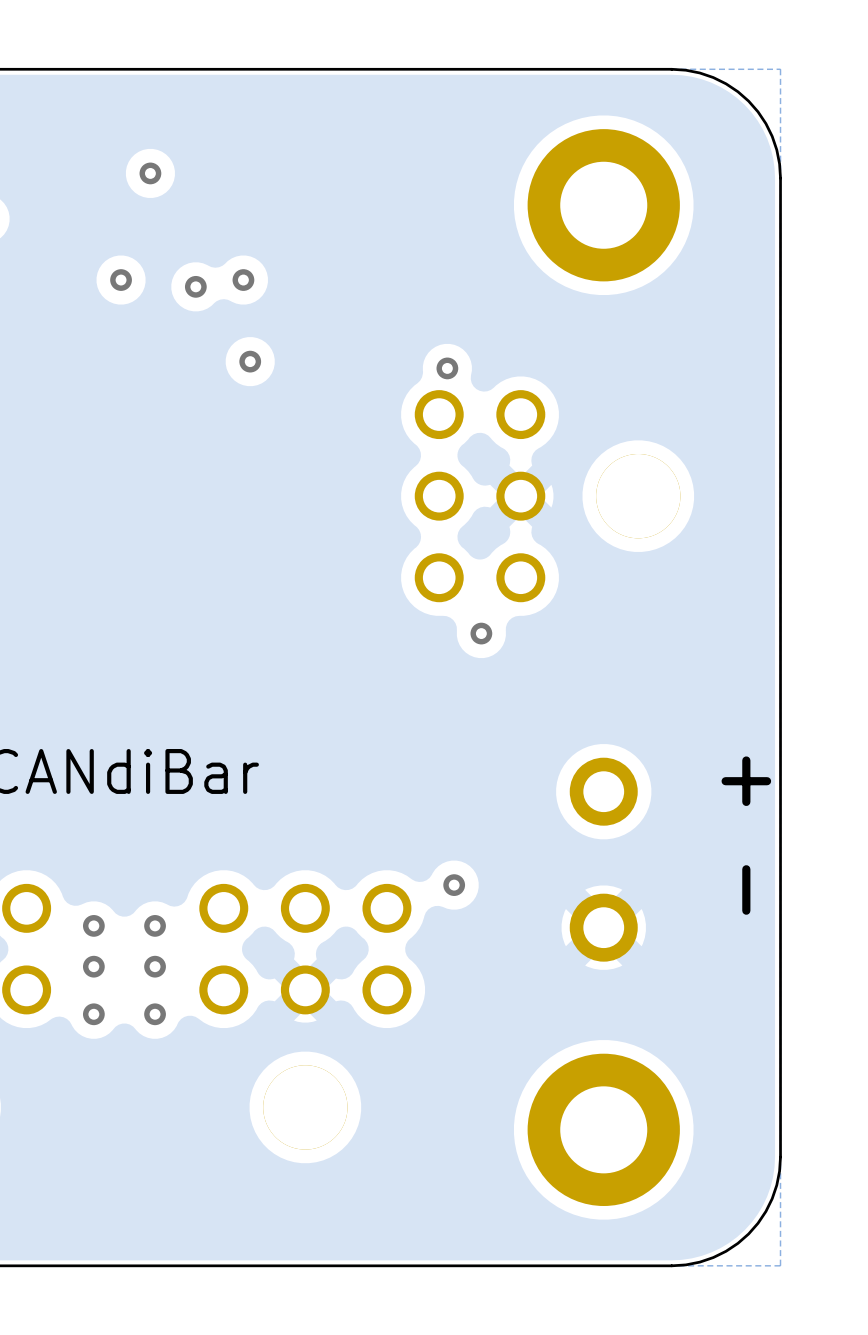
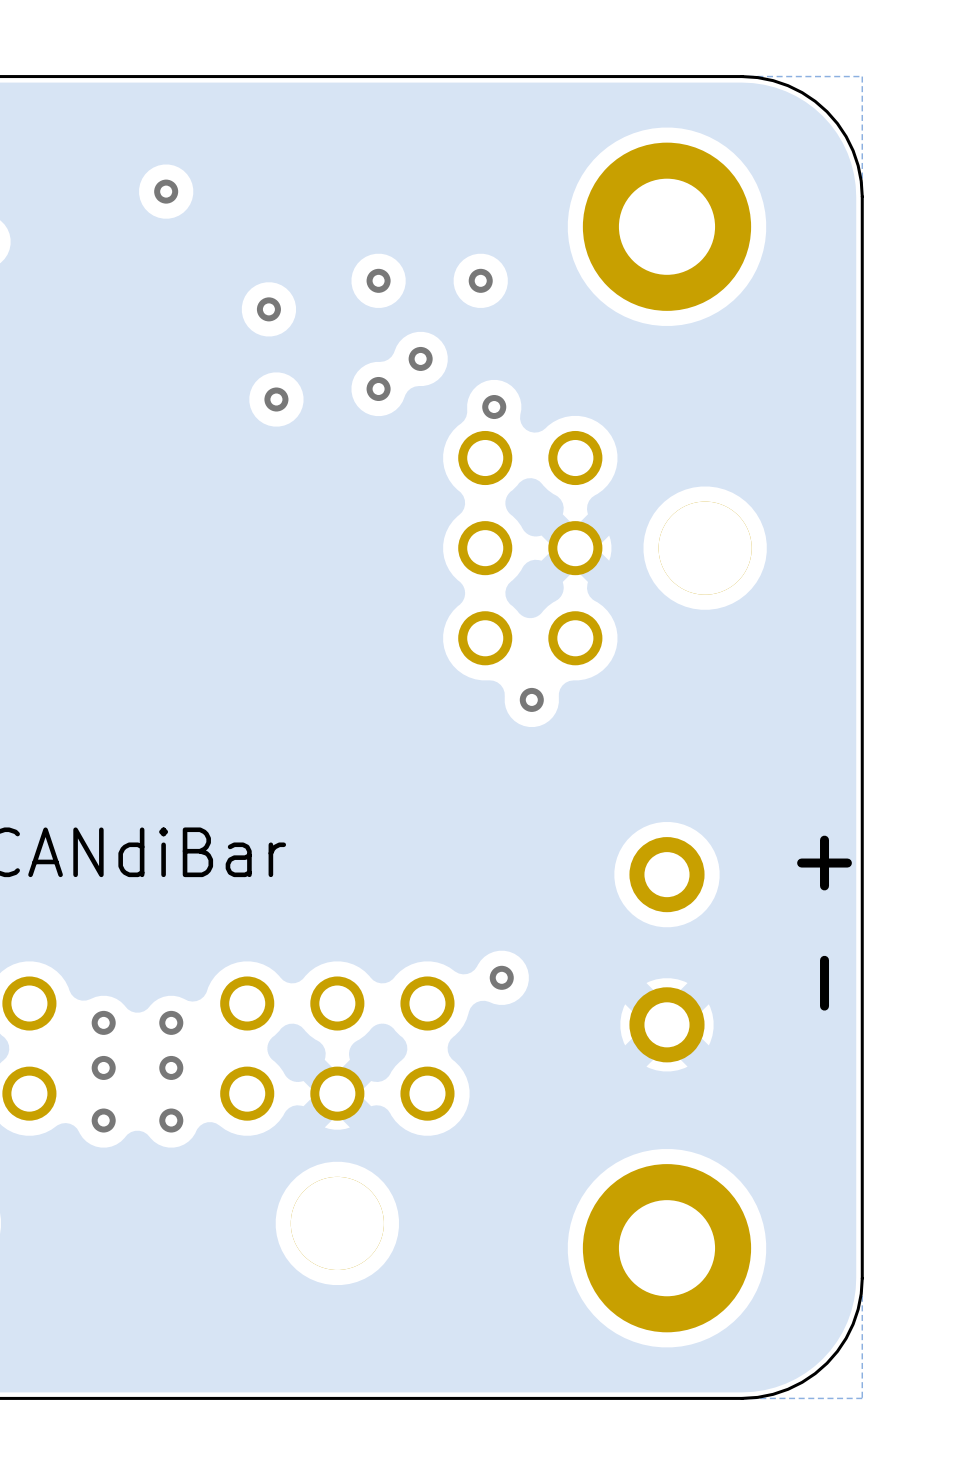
via: none -> (378, 280)
via: none -> (480, 280)
via: (121, 280) -> none
via: (195, 286) -> none
via: none -> (420, 358)
via: none -> (378, 388)

